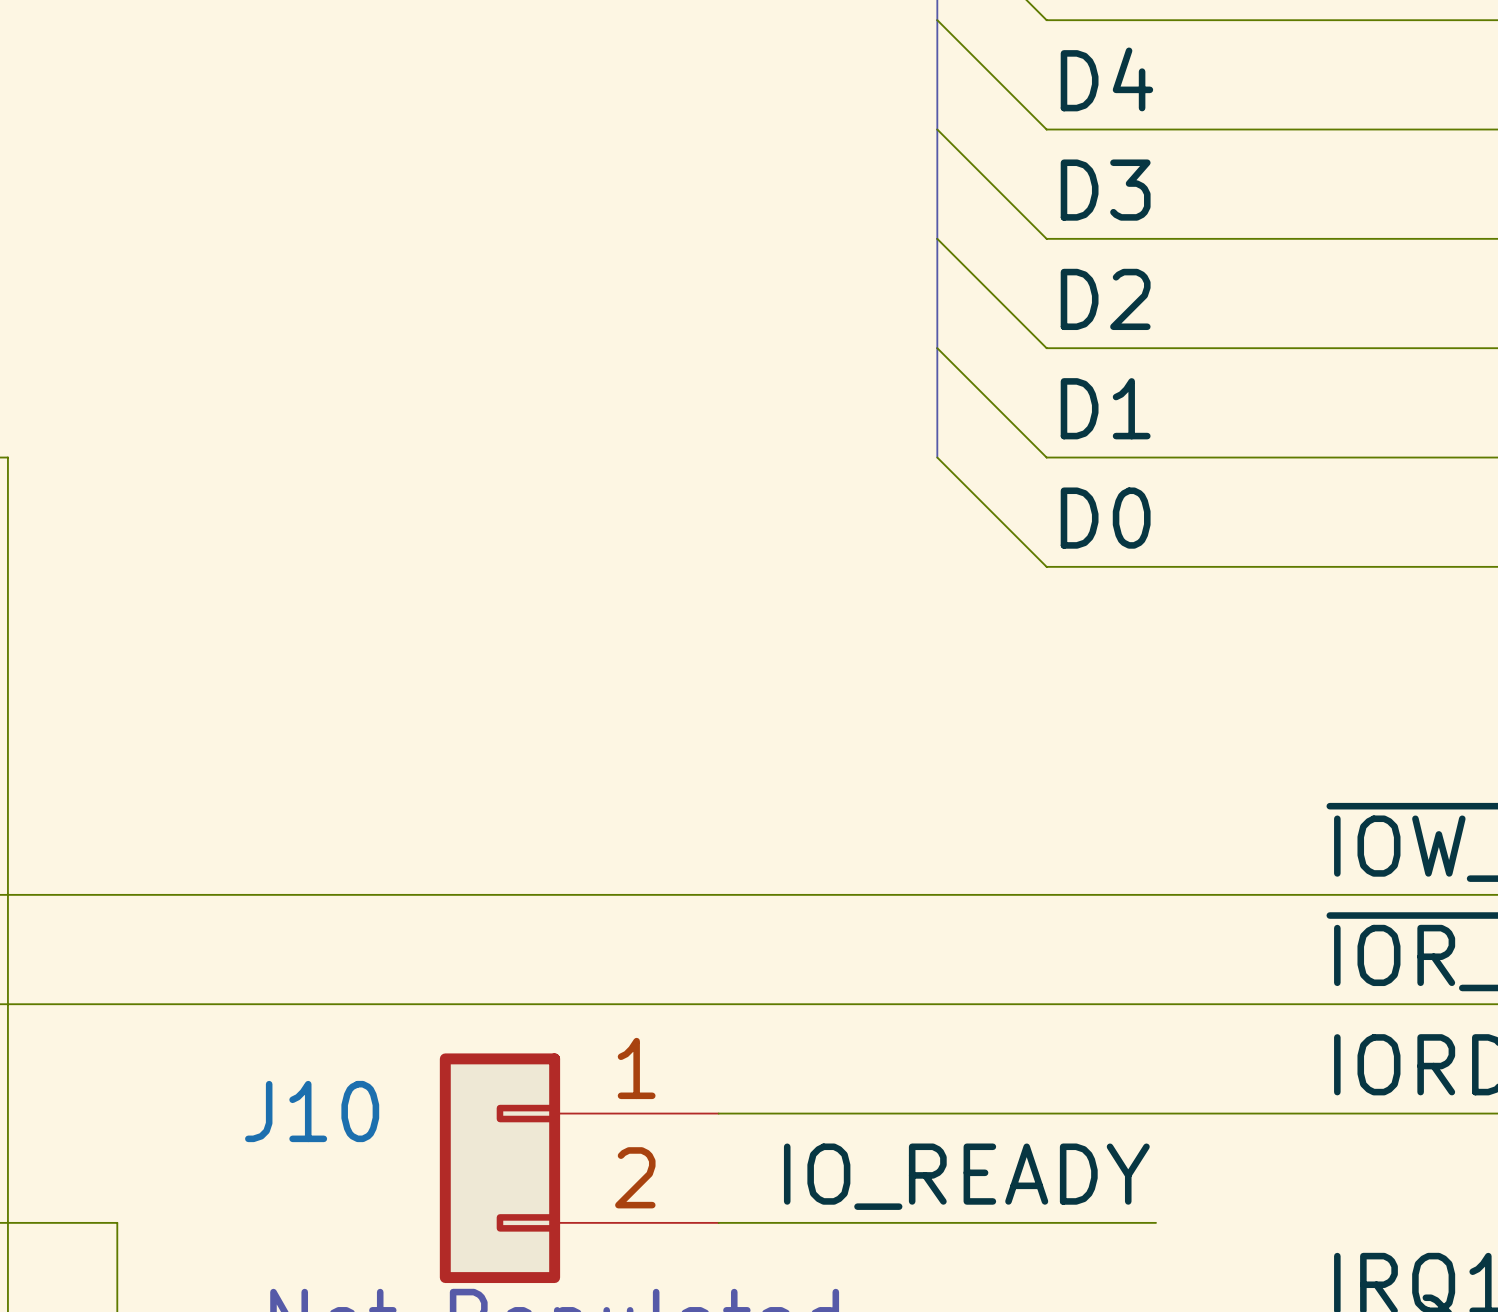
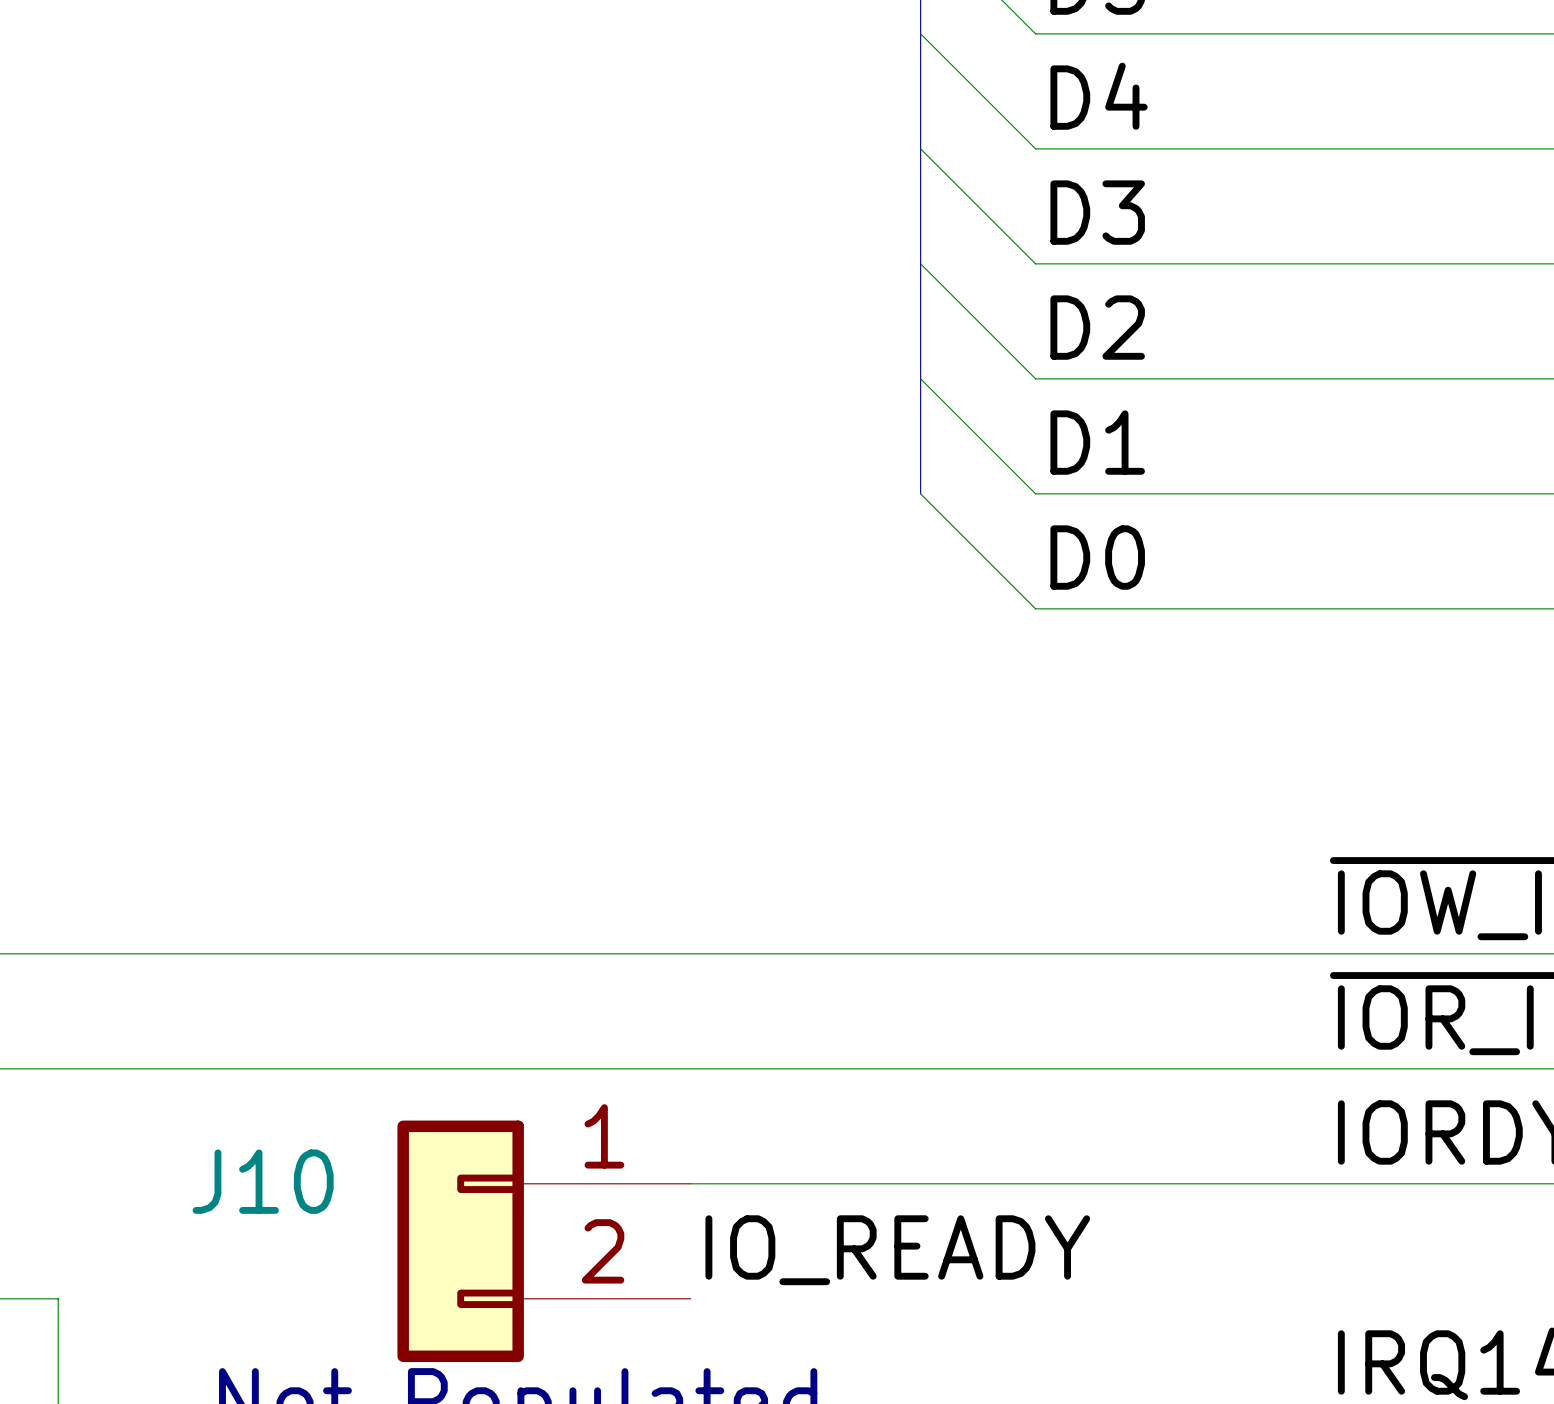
label position: IO_READY (966, 1176) -> IO_READY (897, 1250)
wire: (718, 1222) (1155, 1222) -> none

